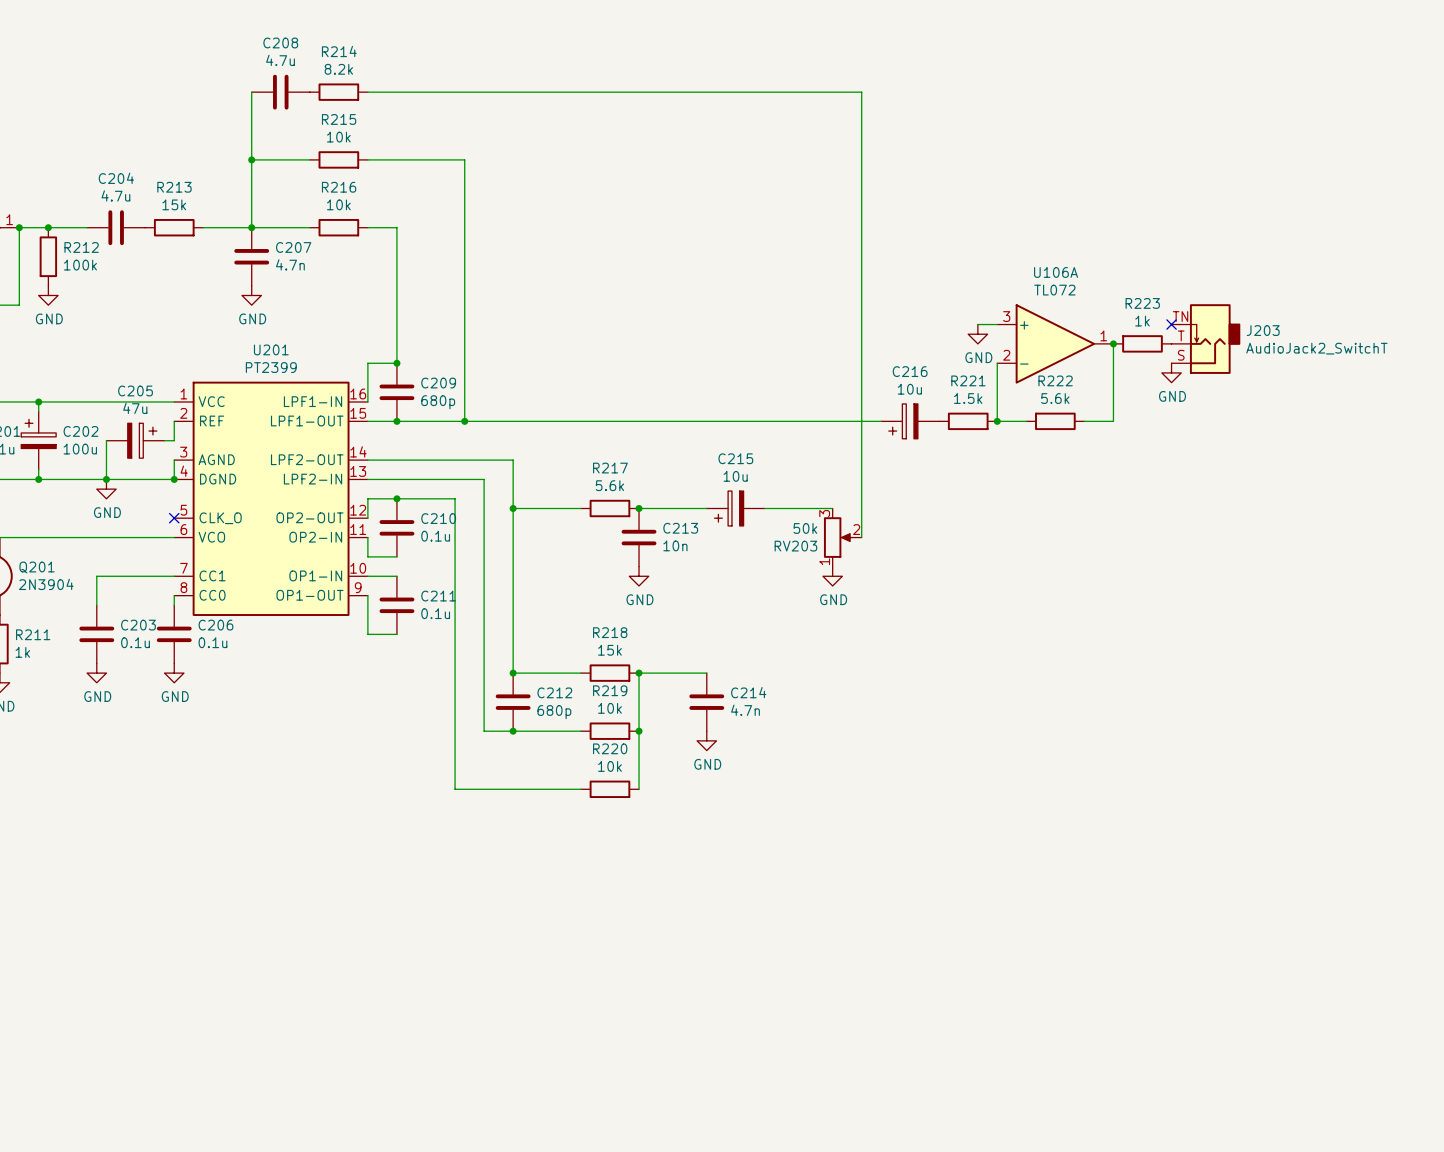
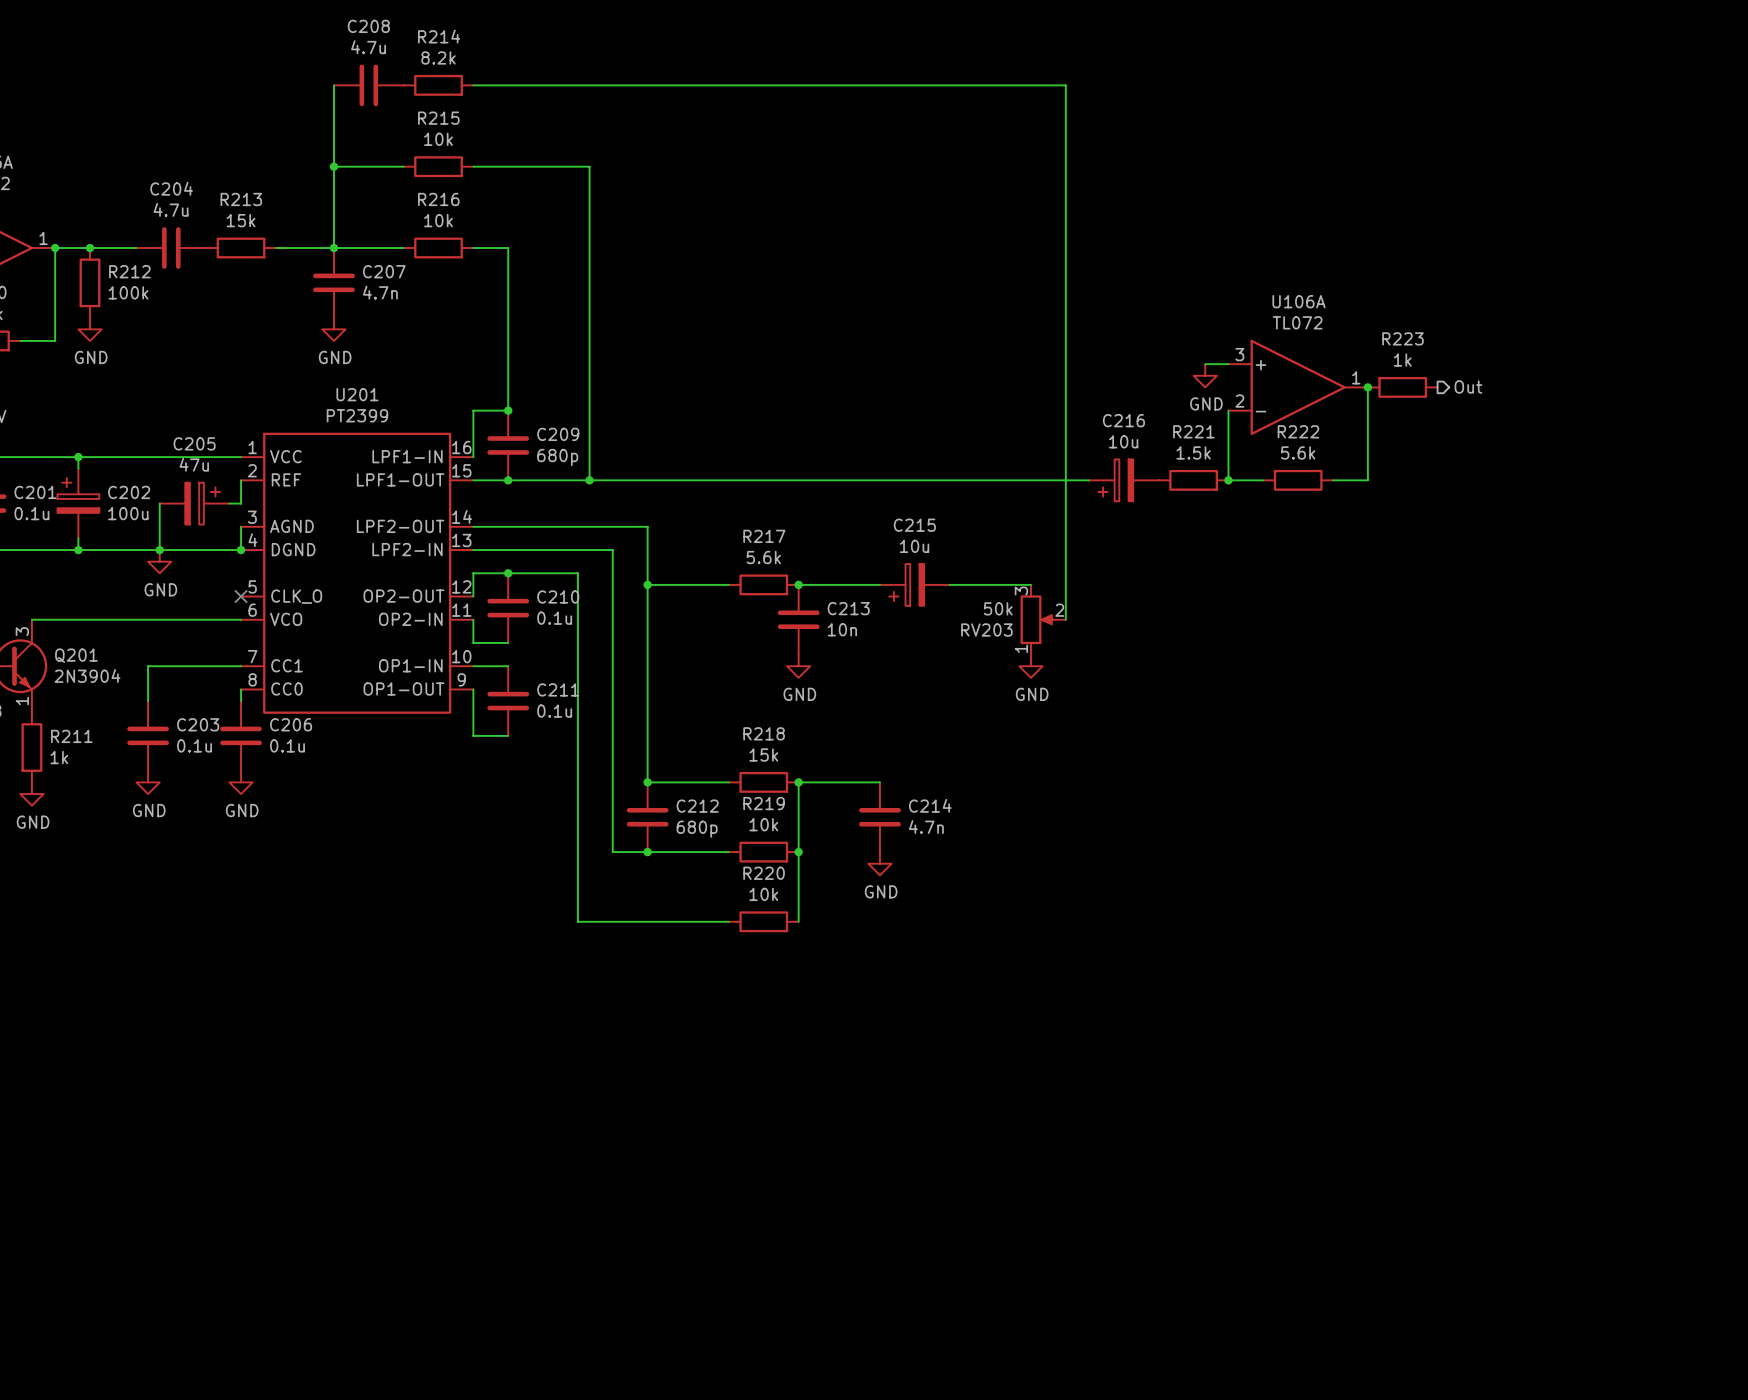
no-connect mark: (1171, 324) -> none
J203: AudioJack2_SwitchT (1205, 339) -> none
hierarchical label: none -> Out (1468, 386)
power symbol: GND (1171, 372) -> none

